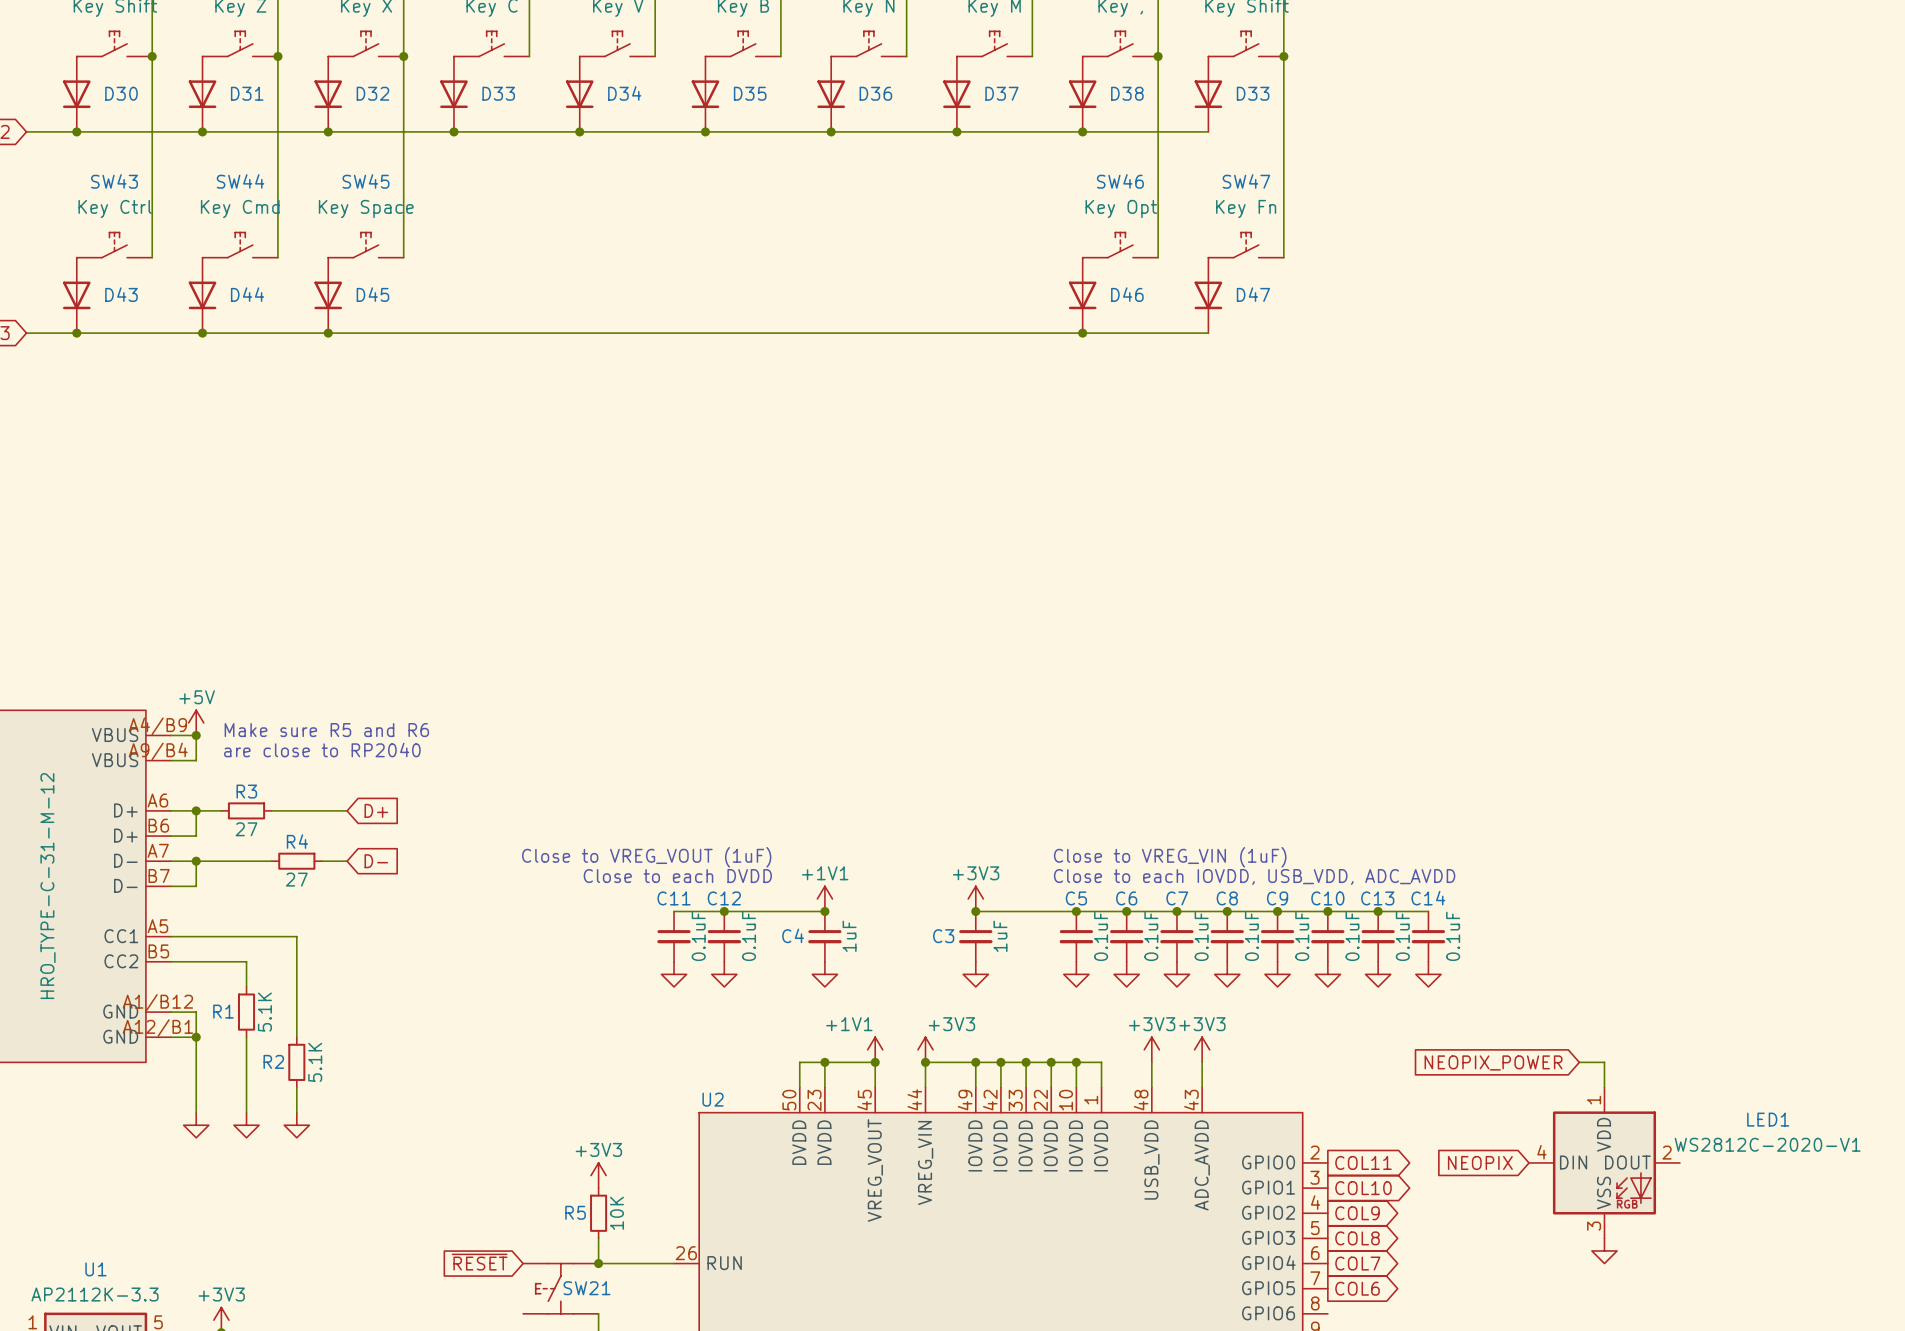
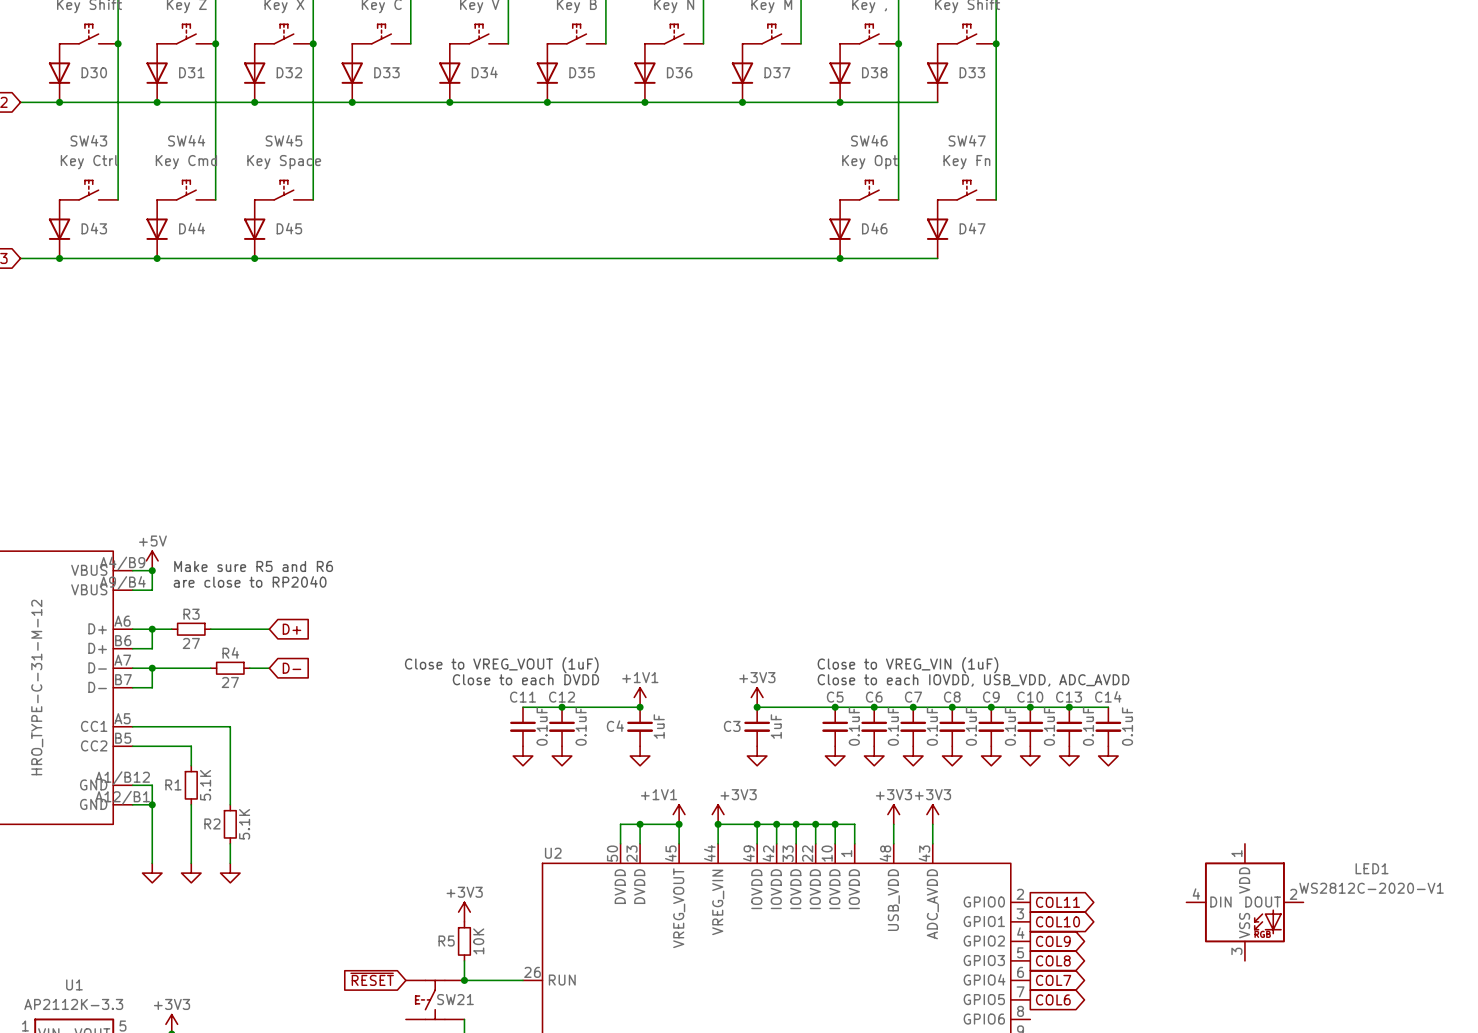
global label: NEOPIX_POWER (1493, 1062) -> none
wire: (1579, 1062) (1604, 1062) (1604, 1087) -> none
global label: NEOPIX (1480, 1162) -> none
power symbol: (1604, 1250) -> none

